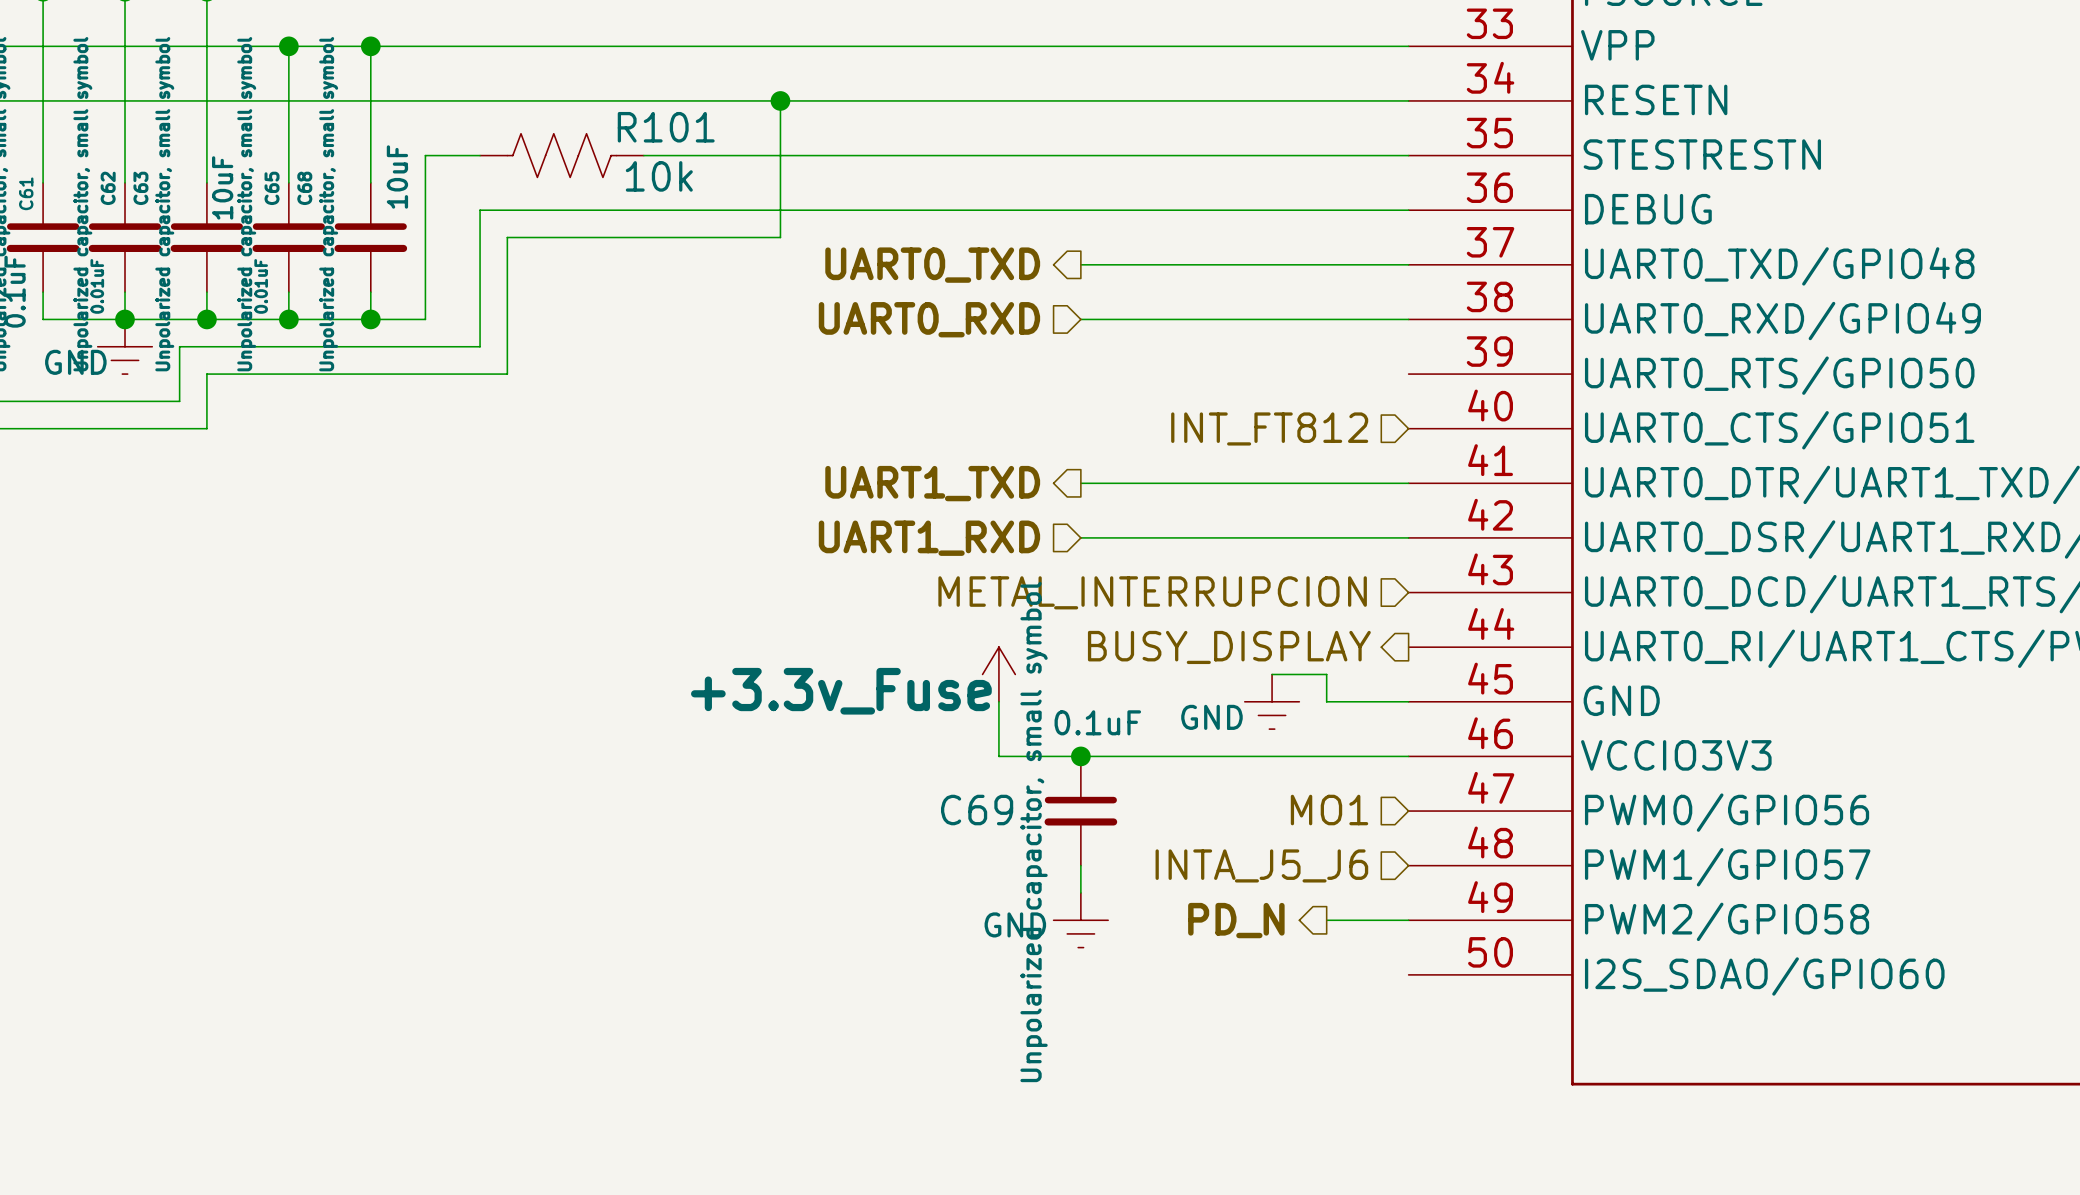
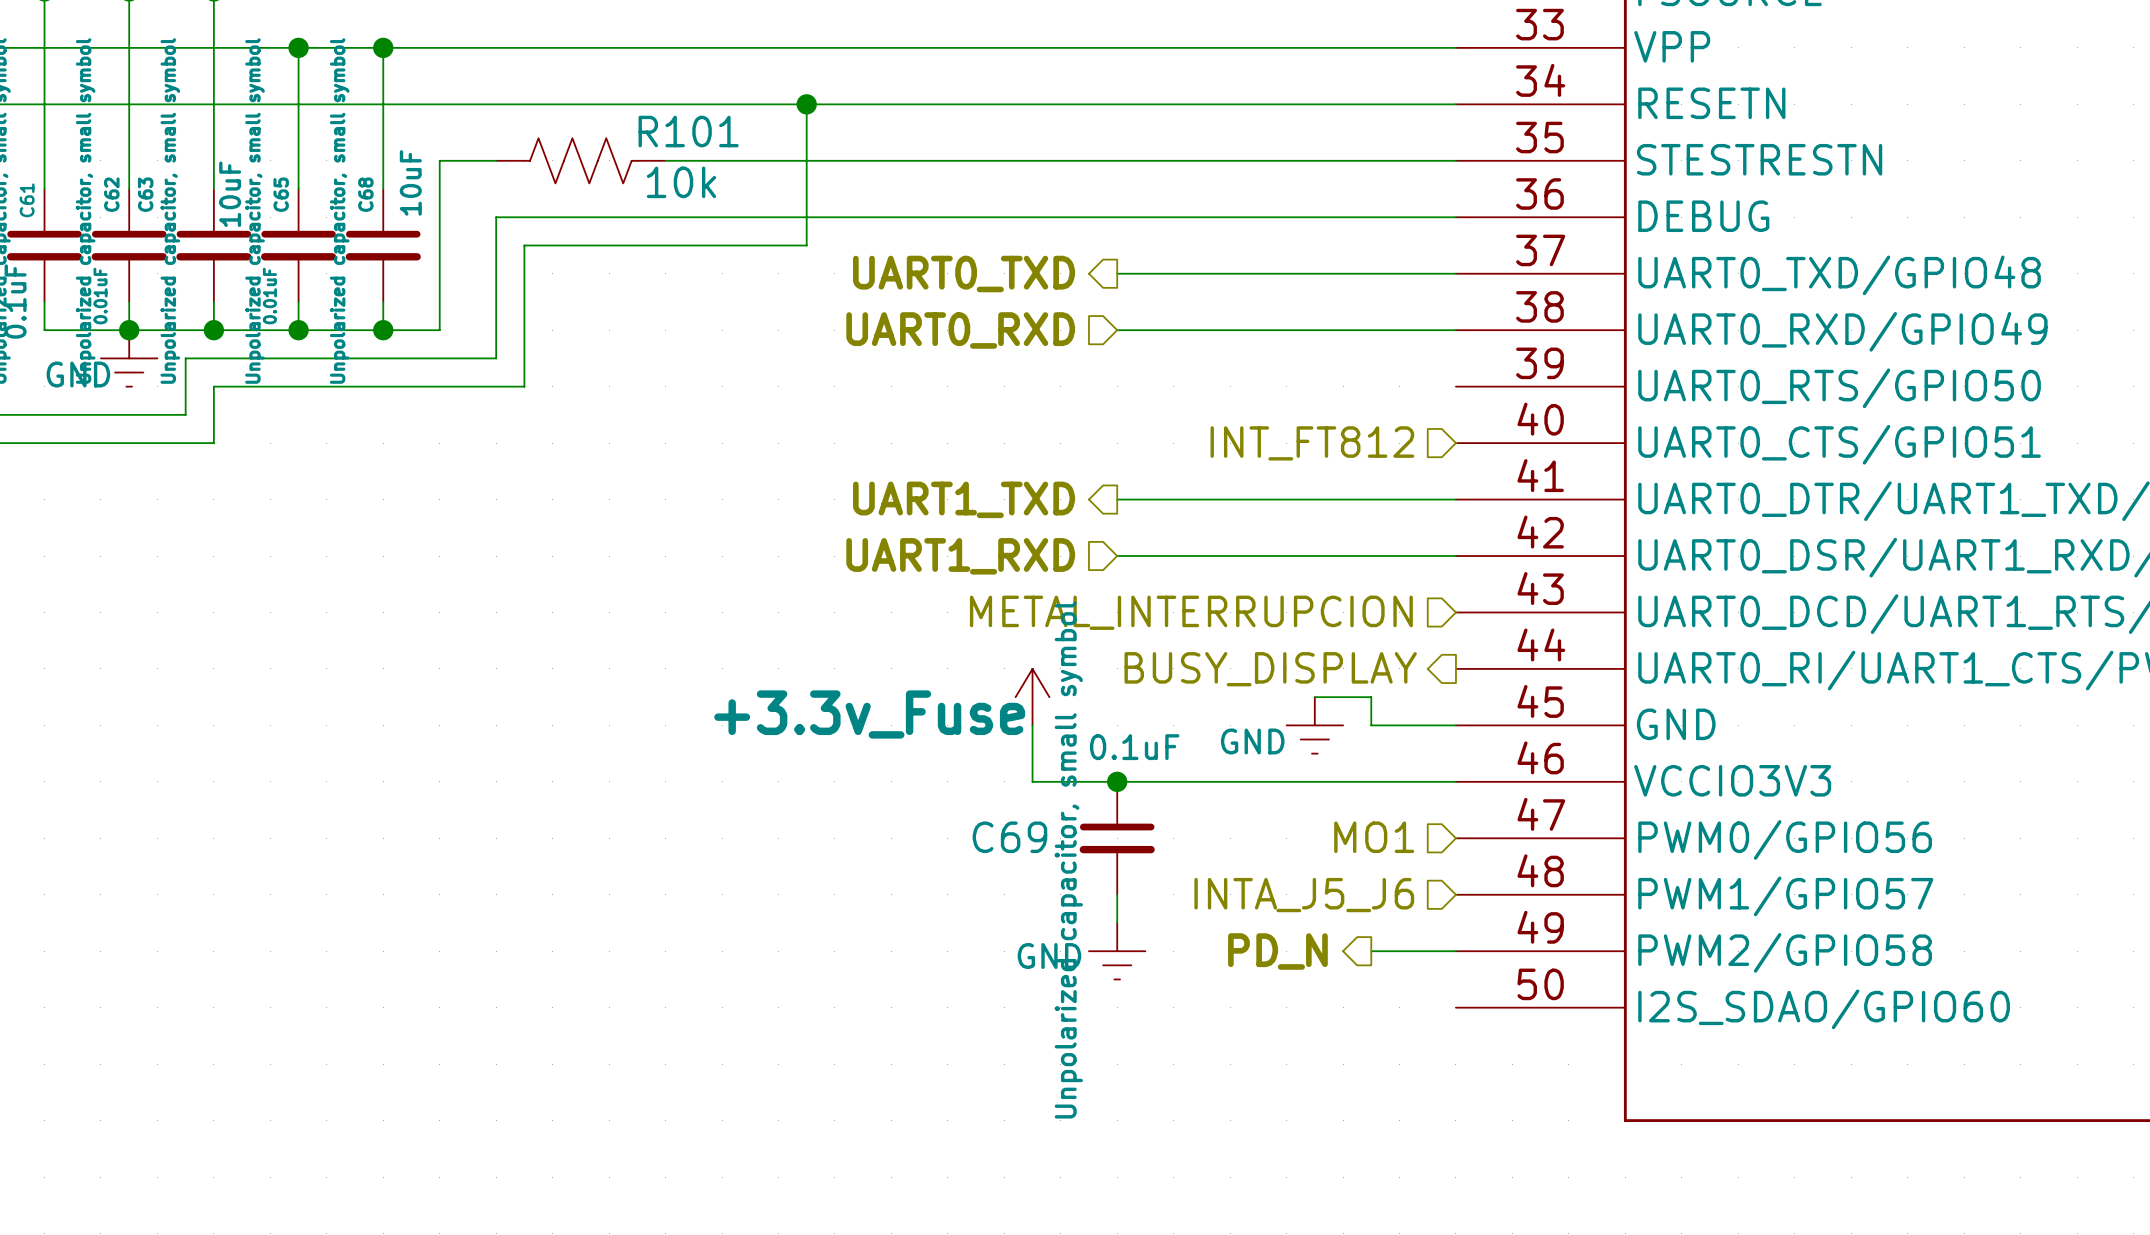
C68 name position: C68 (304, 188) -> C68 (365, 194)

